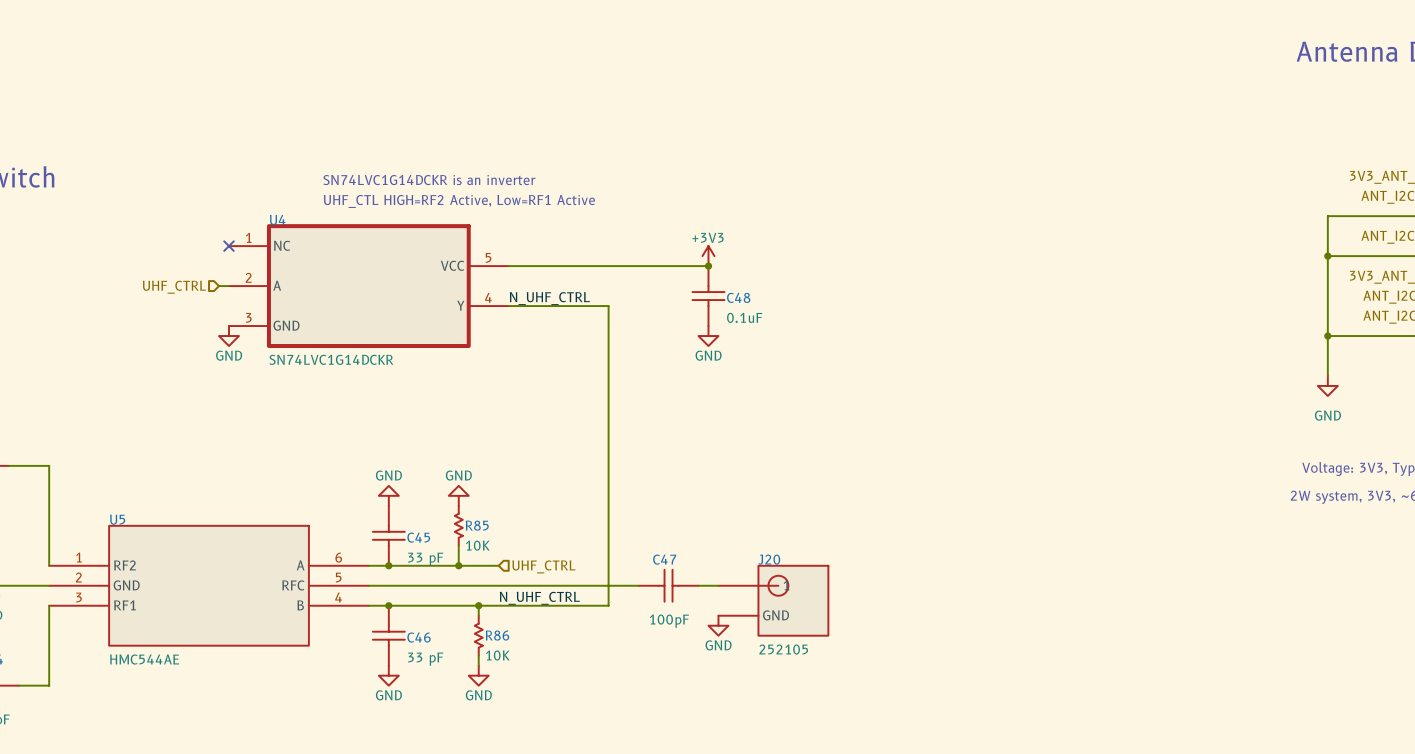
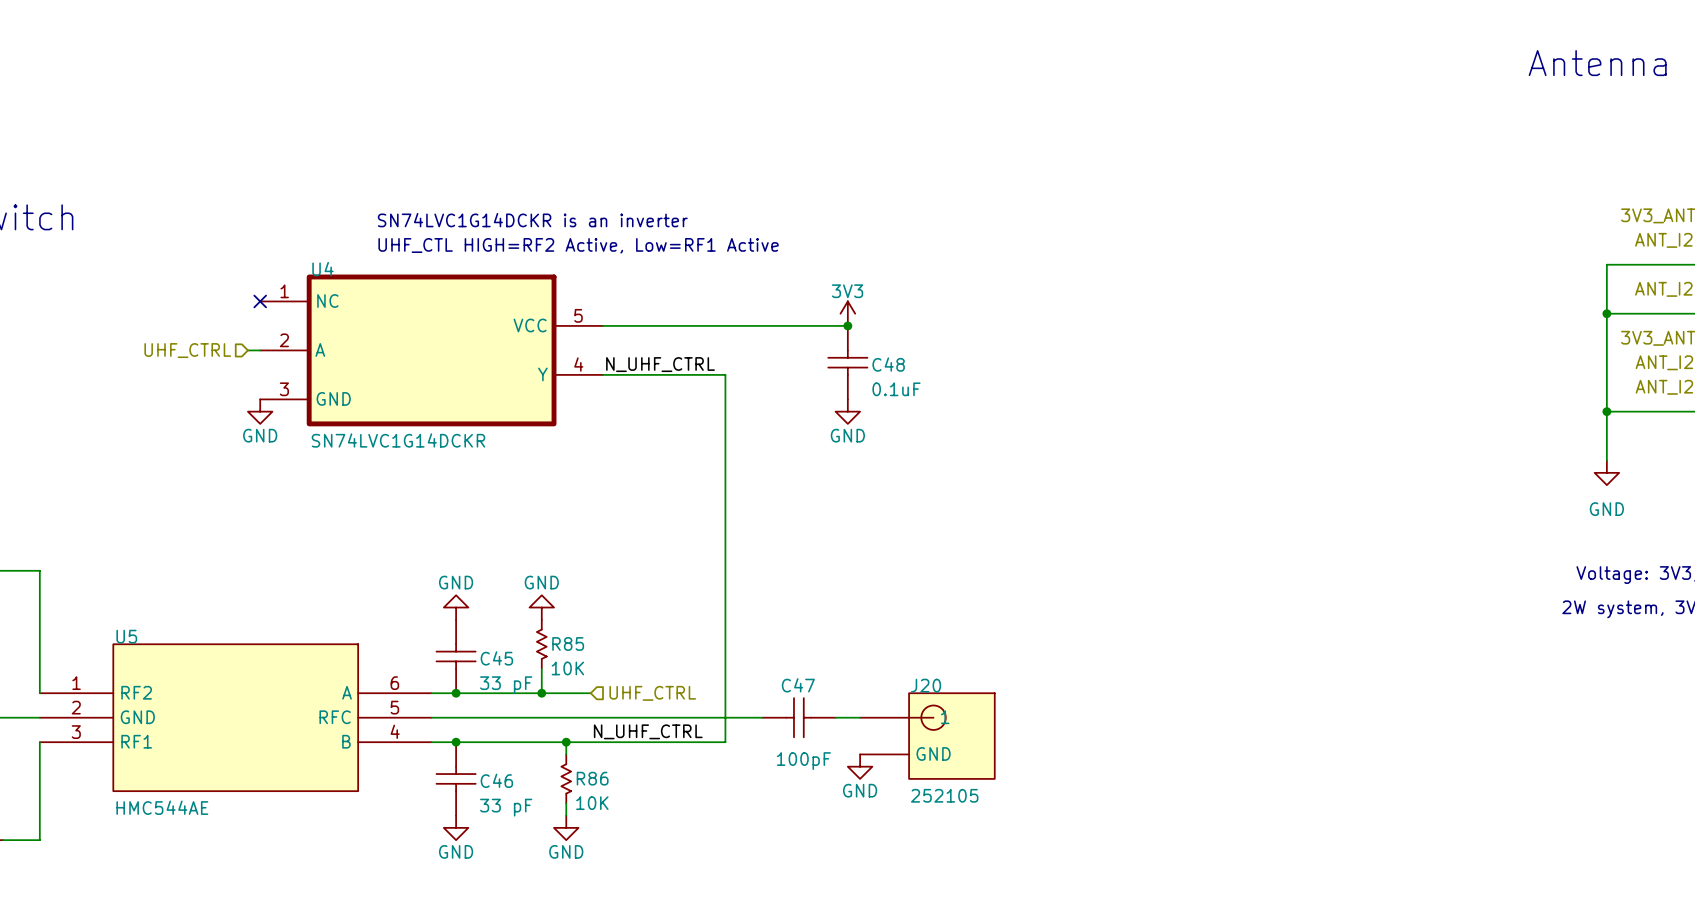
power symbol: +3V3 (708, 256) -> 3V3 (847, 313)

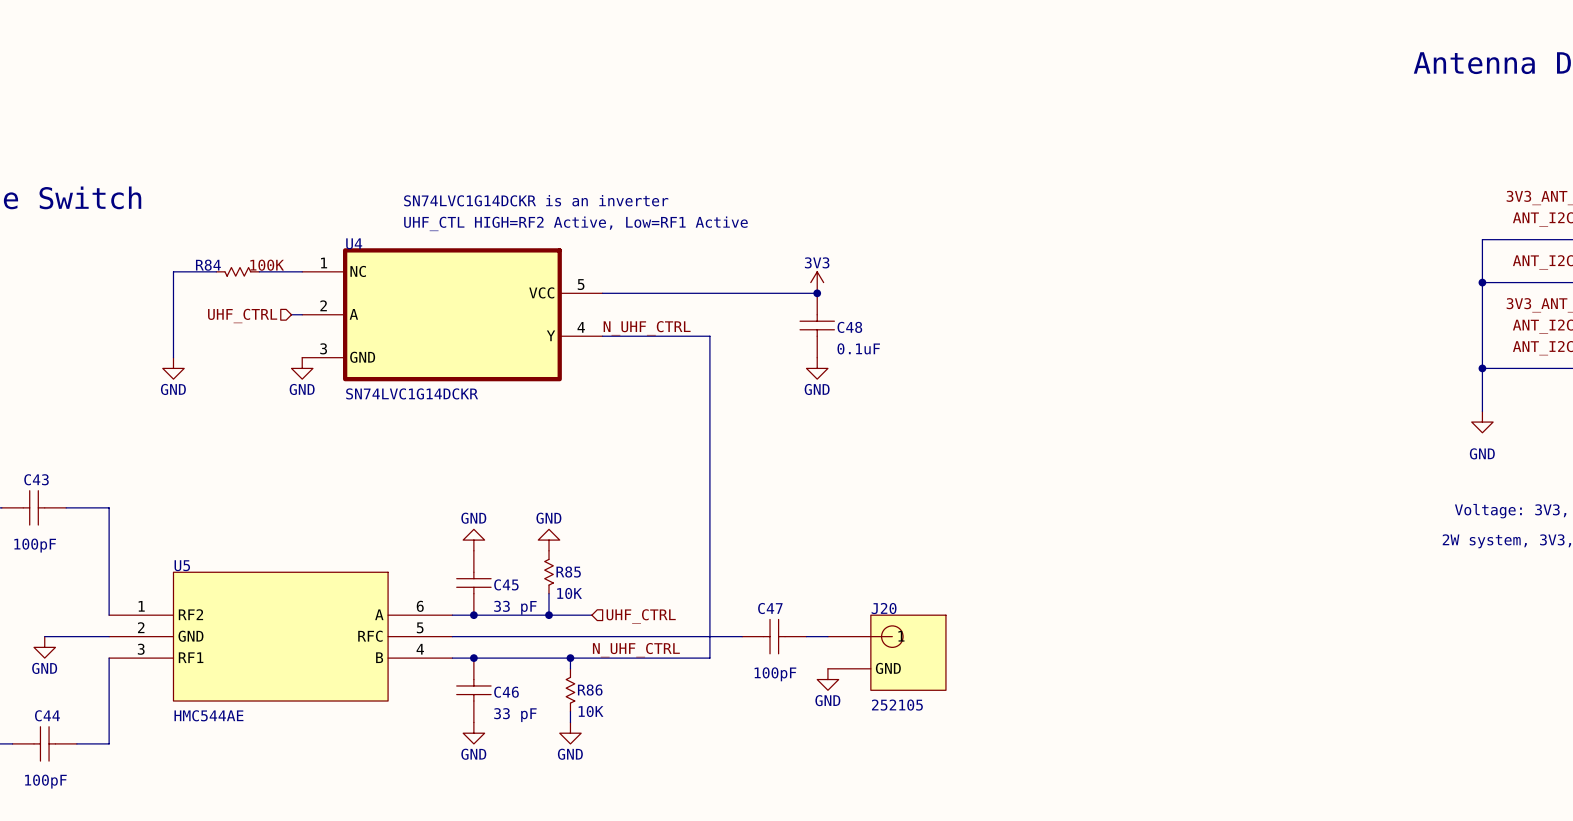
wire: none -> (216, 271) (173, 271) (173, 357)
R84: none -> (237, 271)
wire: none -> (259, 271) (302, 271)
no-connect mark: (260, 301) -> none
power symbol: none -> GND (173, 368)

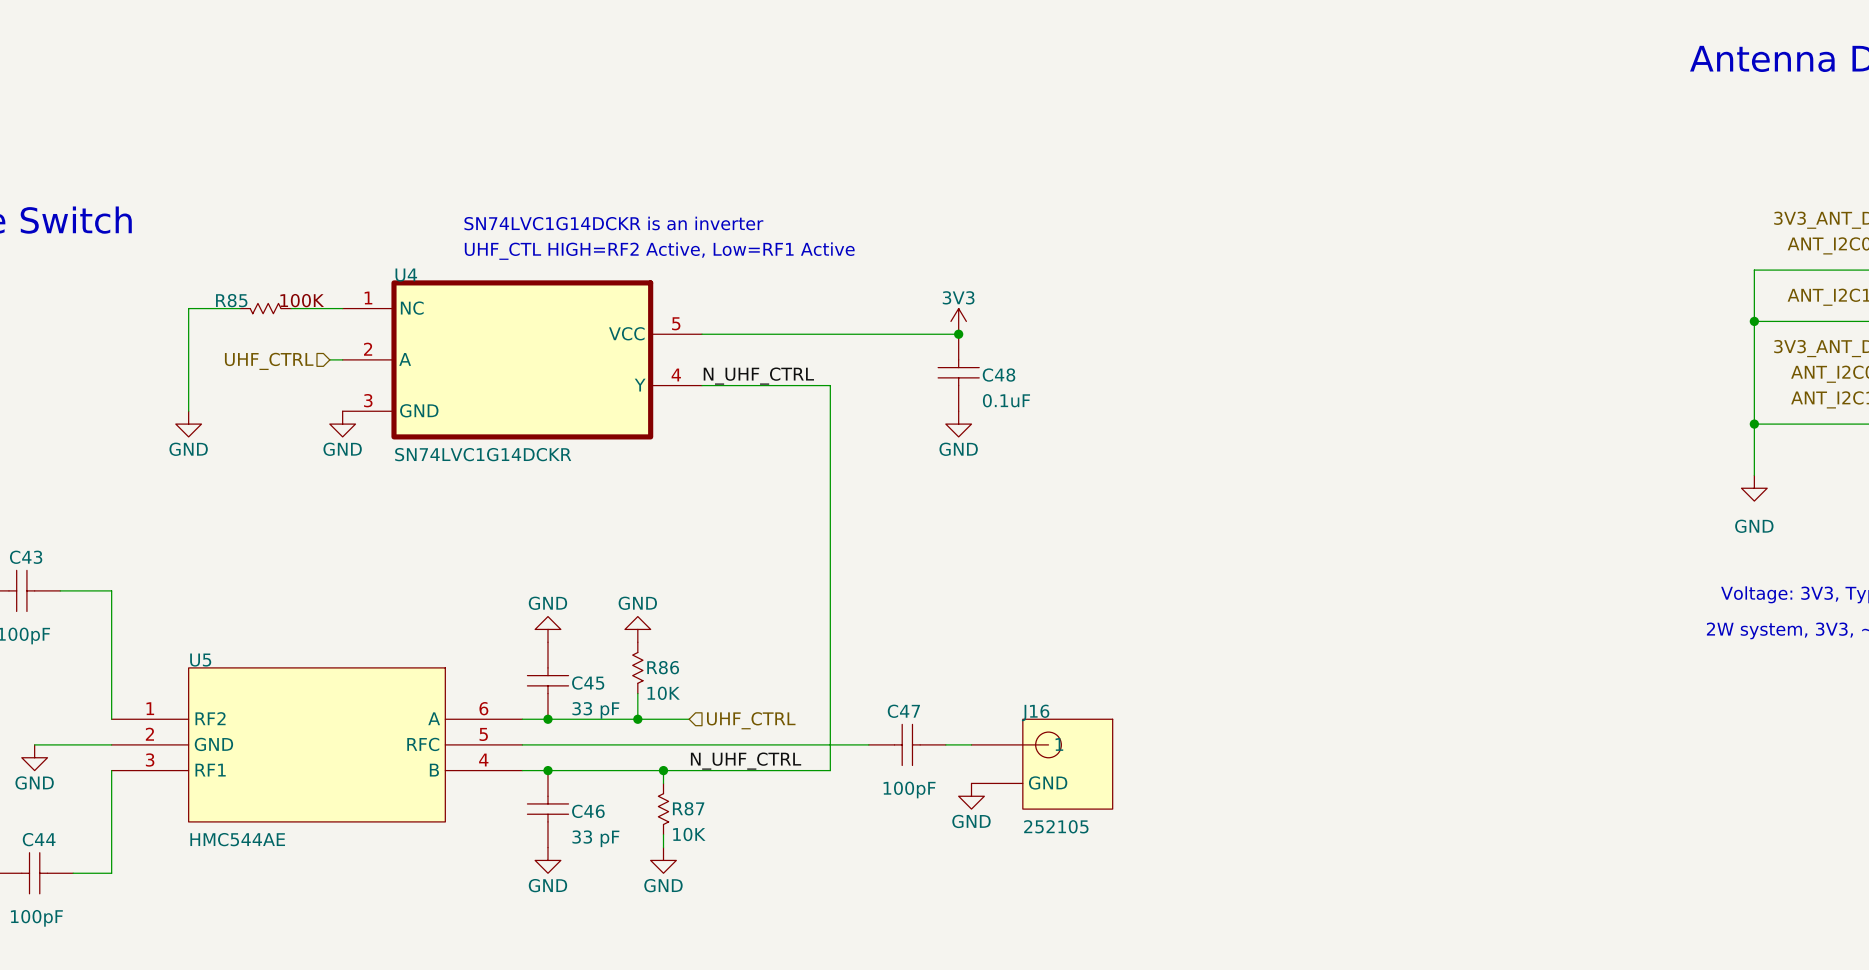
R84 name: R84 (208, 265) -> R85 (231, 300)
R85 name: R85 (568, 572) -> R86 (663, 667)
J20 name: J20 (884, 608) -> J16 (1035, 712)
R86 name: R86 (590, 690) -> R87 (688, 808)

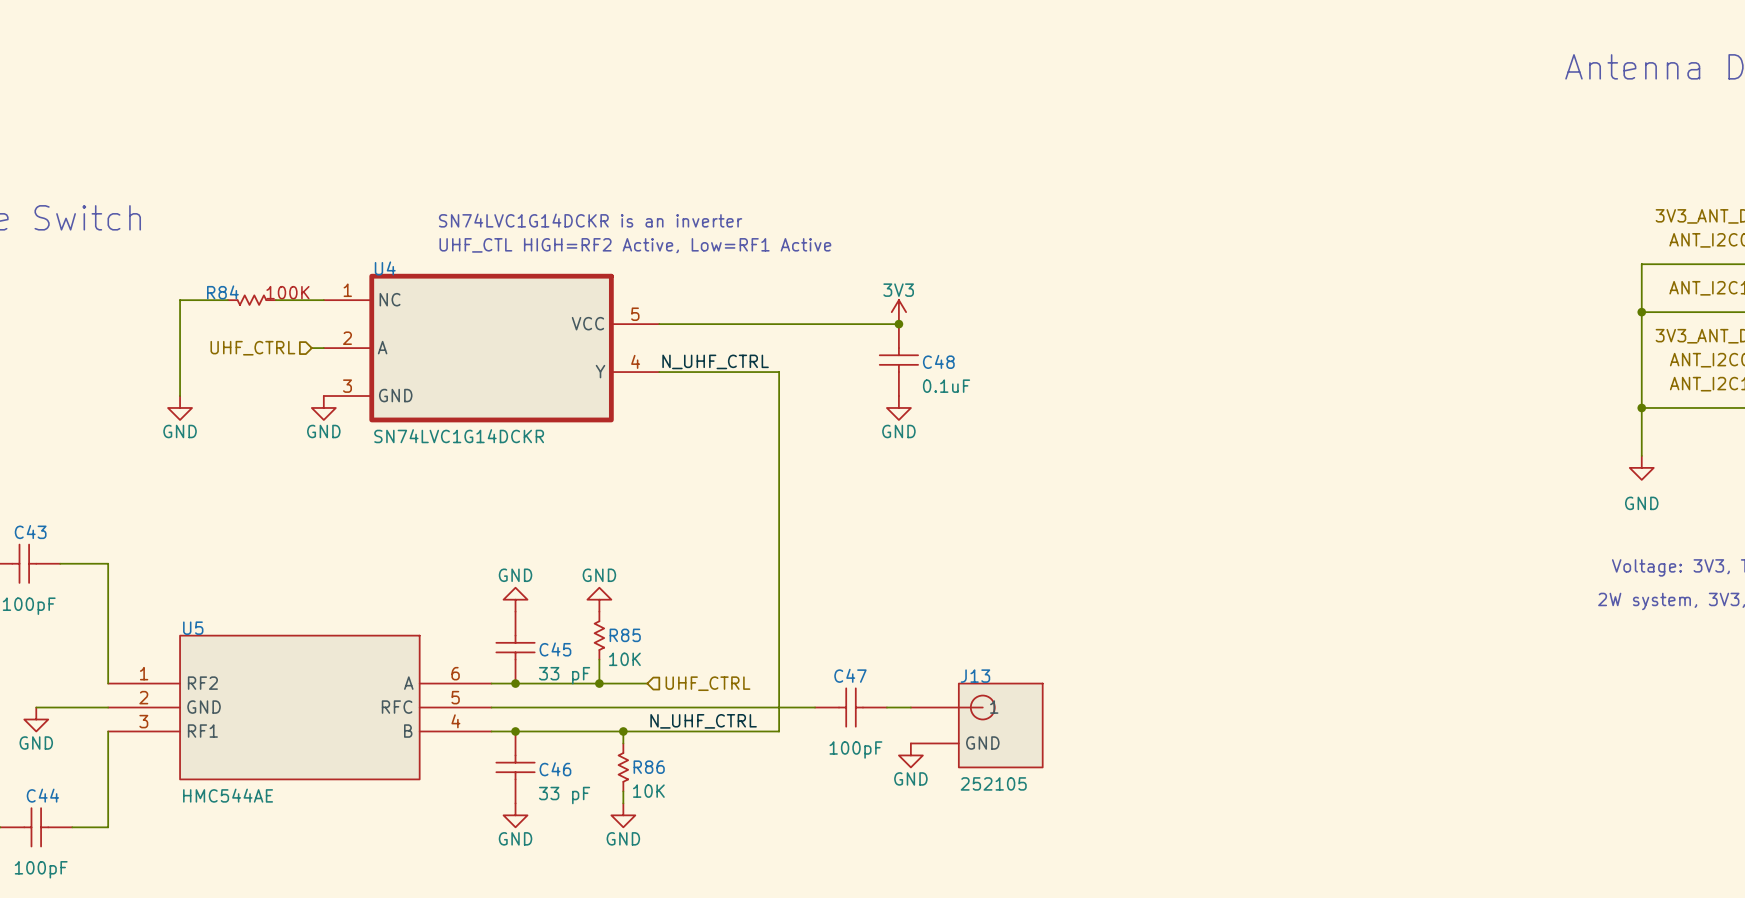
R85 name: R85 (231, 300) -> R84 (222, 292)
R86 name: R86 (663, 667) -> R85 (625, 635)
J16 name: J16 (1035, 712) -> J13 (975, 676)
R87 name: R87 (688, 808) -> R86 (649, 767)

